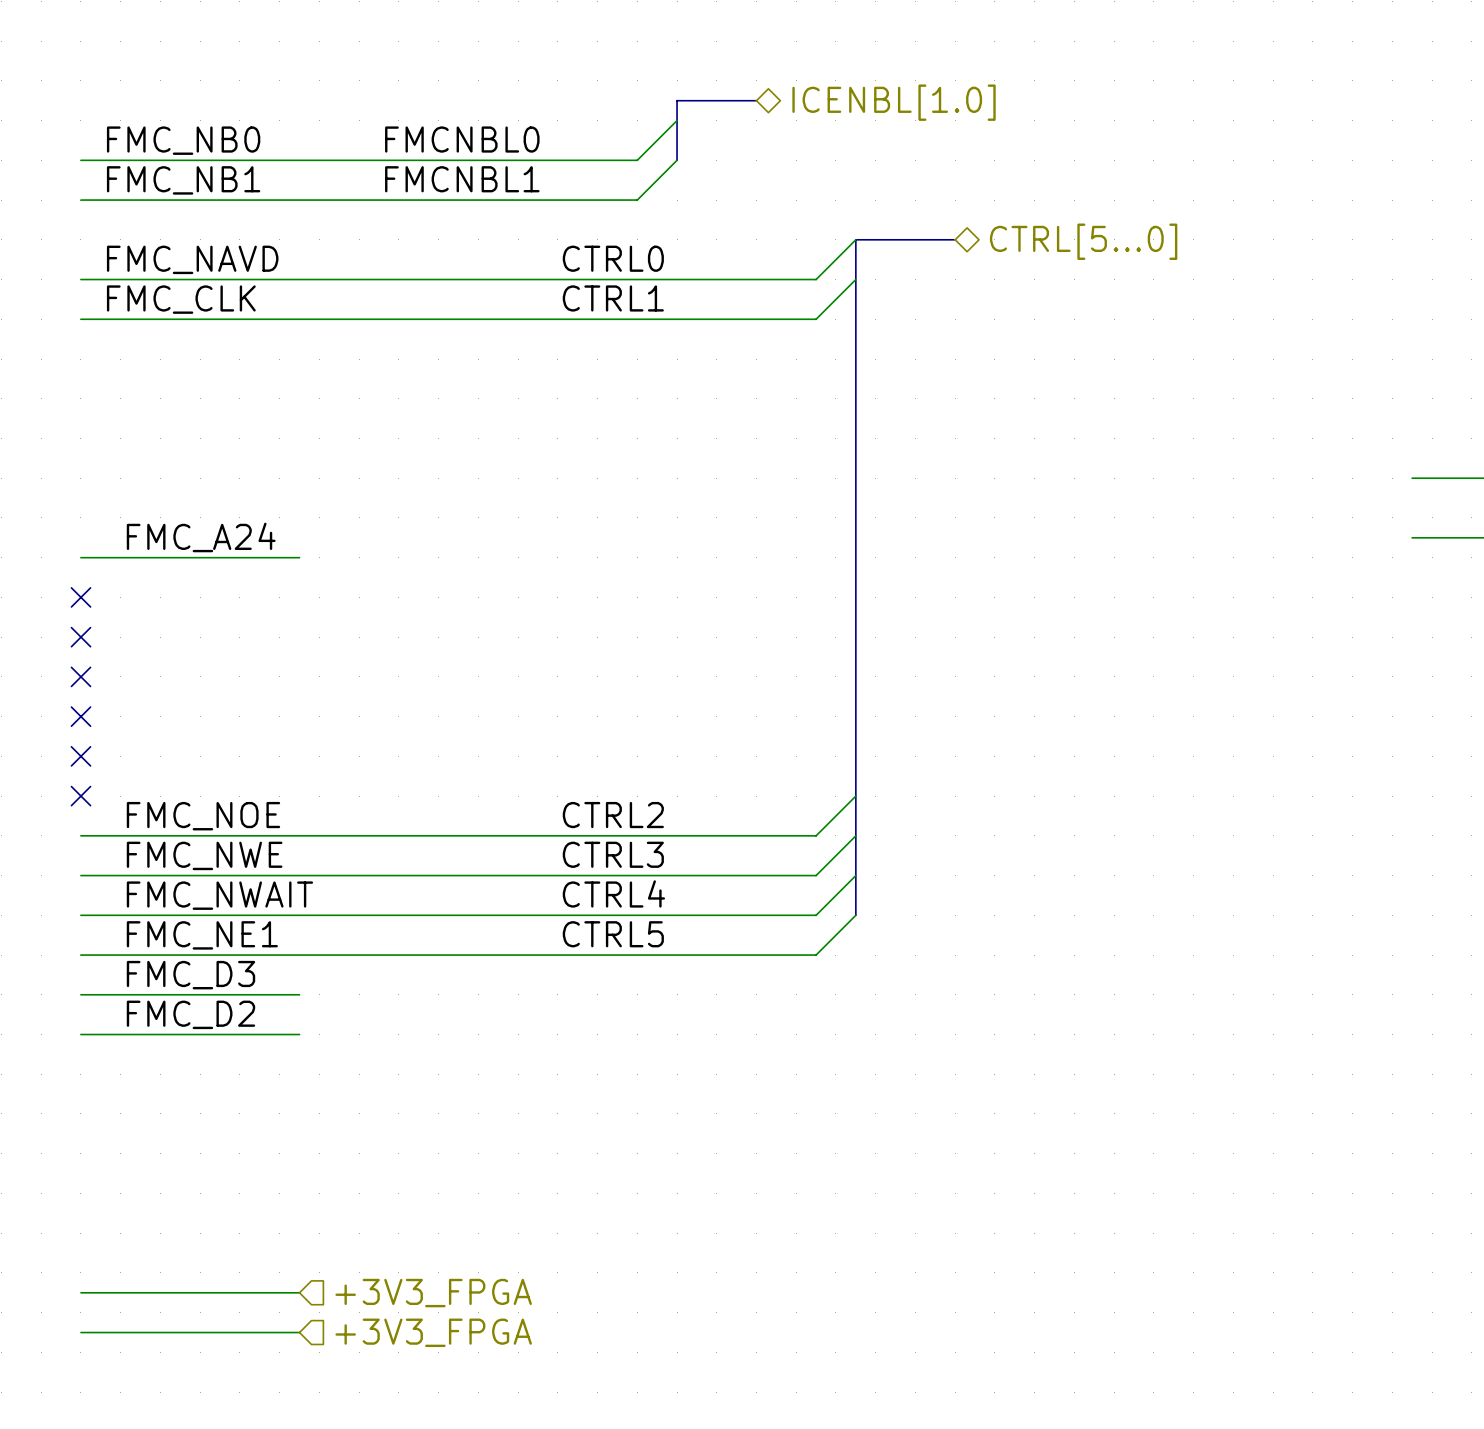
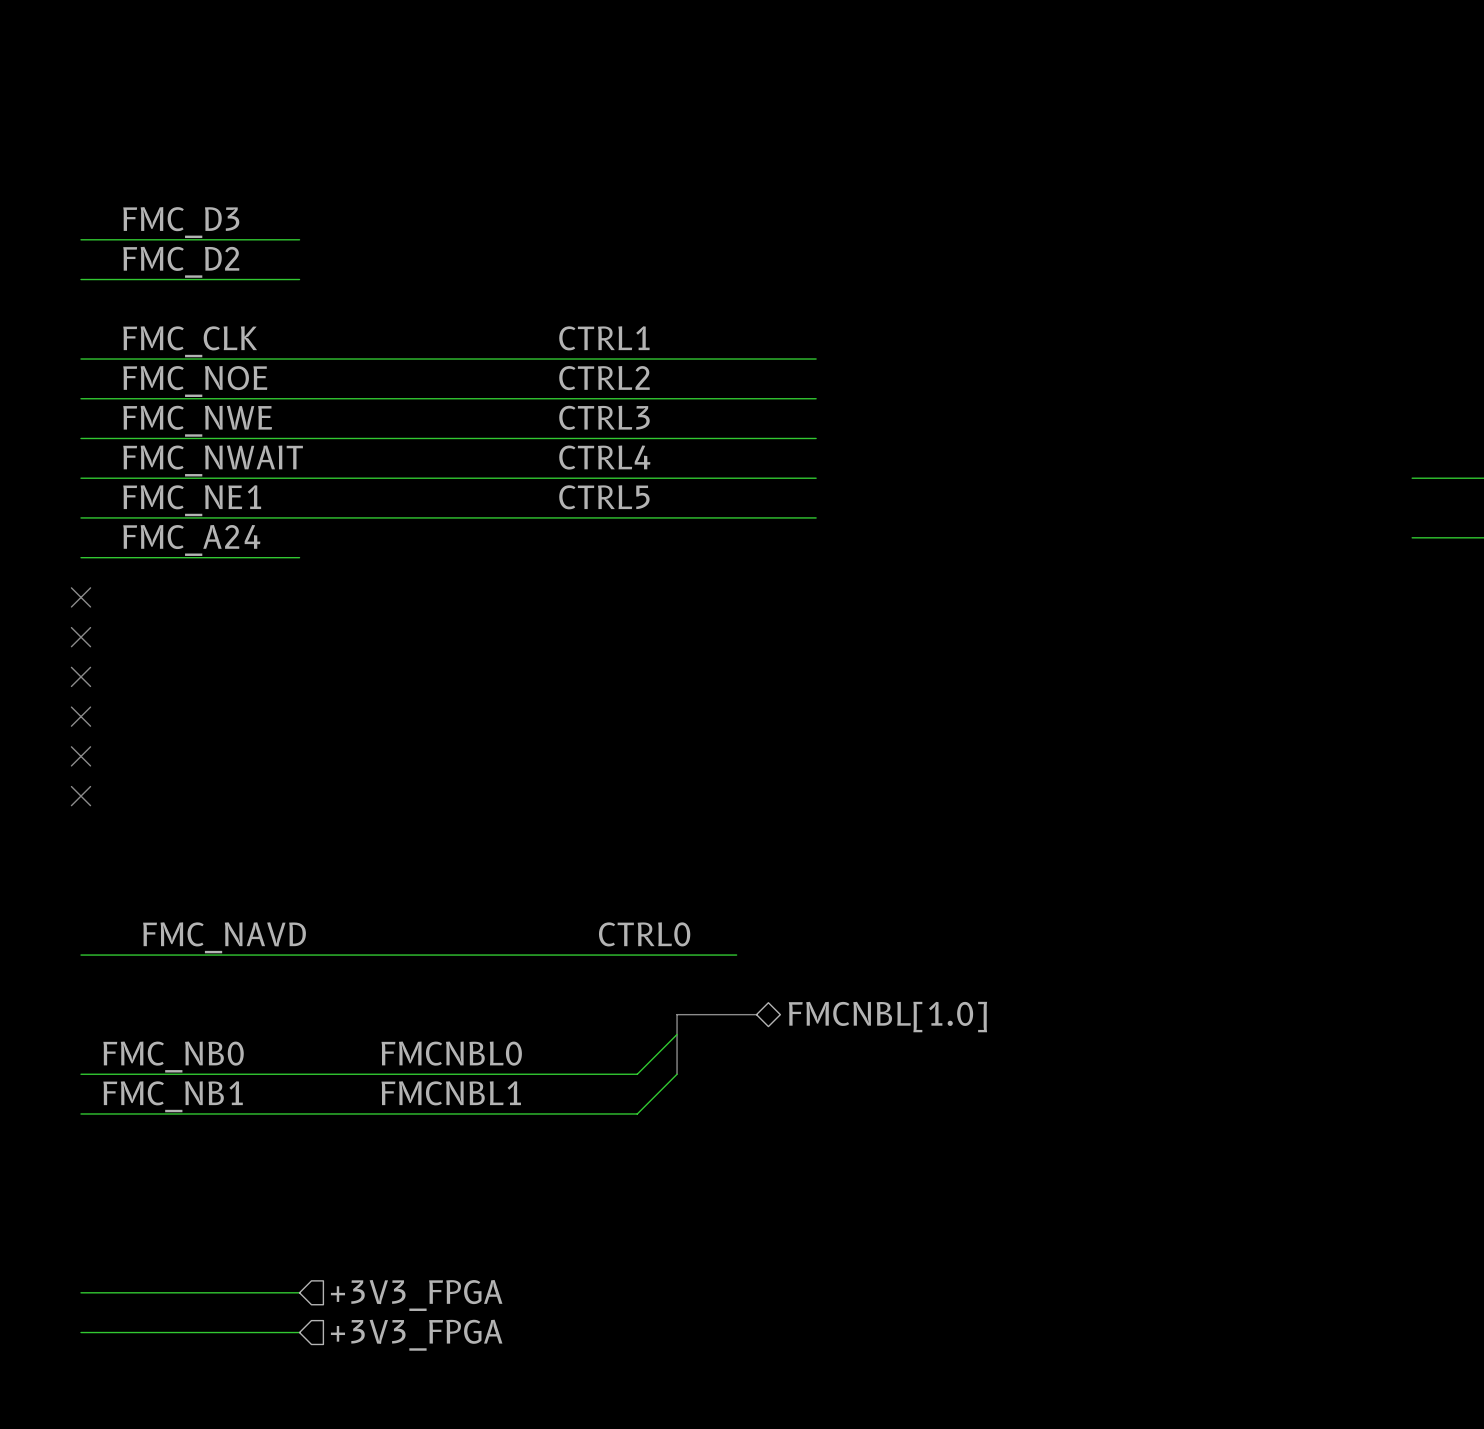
bus: (756, 100) (677, 100) (677, 160) -> none
hierarchical label: ICENBL[1.0] (894, 102) -> none
wire: (677, 120) (637, 160) (80, 160) -> none
label: FMCNBL0 (462, 139) -> none
label: FMC_NB0 (183, 140) -> none
wire: (677, 160) (637, 200) (80, 200) -> none
label: FMCNBL1 (462, 179) -> none
label: FMC_NB1 (183, 180) -> none
label: none -> FMC_D3 (181, 222)
wire: none -> (80, 239) (299, 239)
wire: (855, 239) (816, 279) (299, 279) -> none
bus: (955, 239) (855, 239) (855, 915) -> none
hierarchical label: CTRL[5...0] (1083, 241) -> none
label: CTRL0 (613, 258) -> none
label: FMC_NAVD (192, 259) -> FMC_D2 (181, 262)
wire: (855, 279) (816, 319) (80, 319) -> none
label position: CTRL1 (613, 298) -> CTRL1 (604, 338)
label position: FMC_CLK (181, 299) -> FMC_CLK (190, 341)
wire: none -> (80, 359) (816, 359)
label: none -> CTRL2 (604, 378)
label: none -> FMC_NOE (195, 381)
wire: none -> (80, 398) (816, 398)
label: none -> CTRL3 (604, 417)
label: none -> FMC_NWE (197, 421)
wire: none -> (80, 438) (816, 438)
label: none -> CTRL4 (604, 457)
label: none -> FMC_NWAIT (213, 460)
wire: none -> (80, 478) (816, 478)
label: none -> CTRL5 (604, 497)
label: none -> FMC_NE1 (192, 500)
wire: none -> (80, 517) (816, 517)
wire: (855, 796) (816, 835) (80, 835) -> none
label: CTRL2 (613, 815) -> none
label: FMC_NOE (203, 816) -> none
wire: (855, 835) (816, 875) (80, 875) -> none
label: CTRL3 (613, 854) -> none
label: FMC_NWE (204, 855) -> none
wire: (855, 875) (816, 915) (80, 915) -> none
label: CTRL4 (613, 893) -> none
label: FMC_NWAIT (219, 895) -> none
wire: (855, 915) (816, 955) (736, 955) -> none
label: CTRL5 (613, 934) -> none
label: none -> CTRL0 (644, 934)
label: FMC_NE1 (202, 935) -> FMC_NAVD (224, 937)
label: FMC_D3 (190, 975) -> none
wire: (80, 994) (299, 994) -> none
label: FMC_D2 (190, 1014) -> FMC_NB0 (173, 1057)
bus: none -> (756, 1014) (677, 1014) (677, 1074)
hierarchical label: none -> FMCNBL[1.0] (887, 1017)
wire: (80, 1034) (299, 1034) -> none
wire: none -> (677, 1034) (637, 1074) (80, 1074)
label: none -> FMCNBL0 (451, 1053)
wire: none -> (677, 1074) (637, 1113) (80, 1113)
label: none -> FMCNBL1 (451, 1093)
label: none -> FMC_NB1 (173, 1096)

